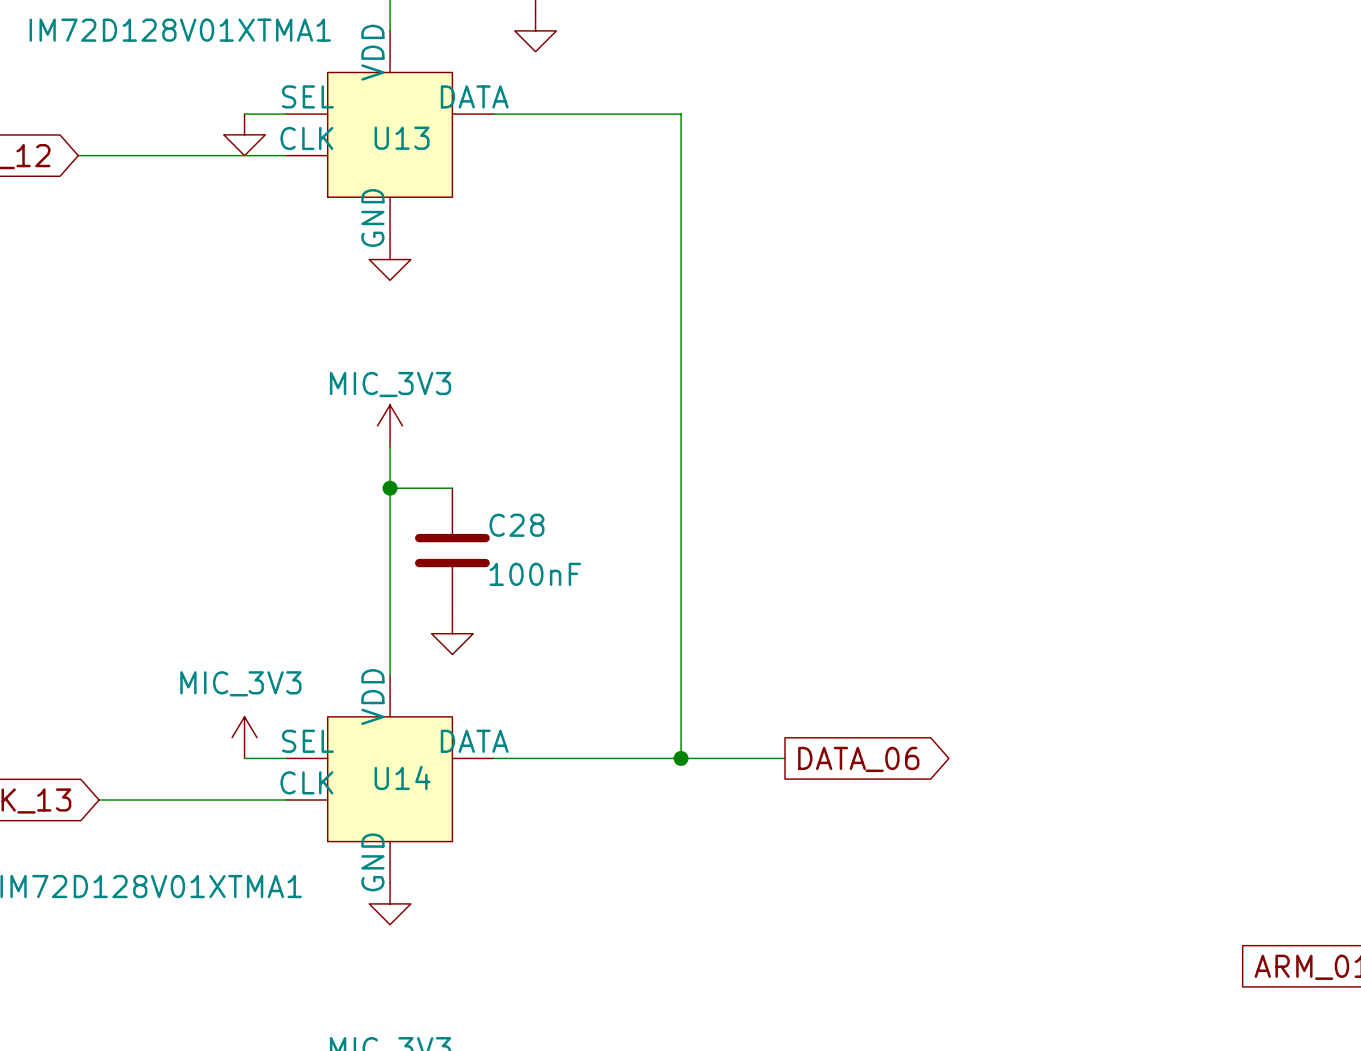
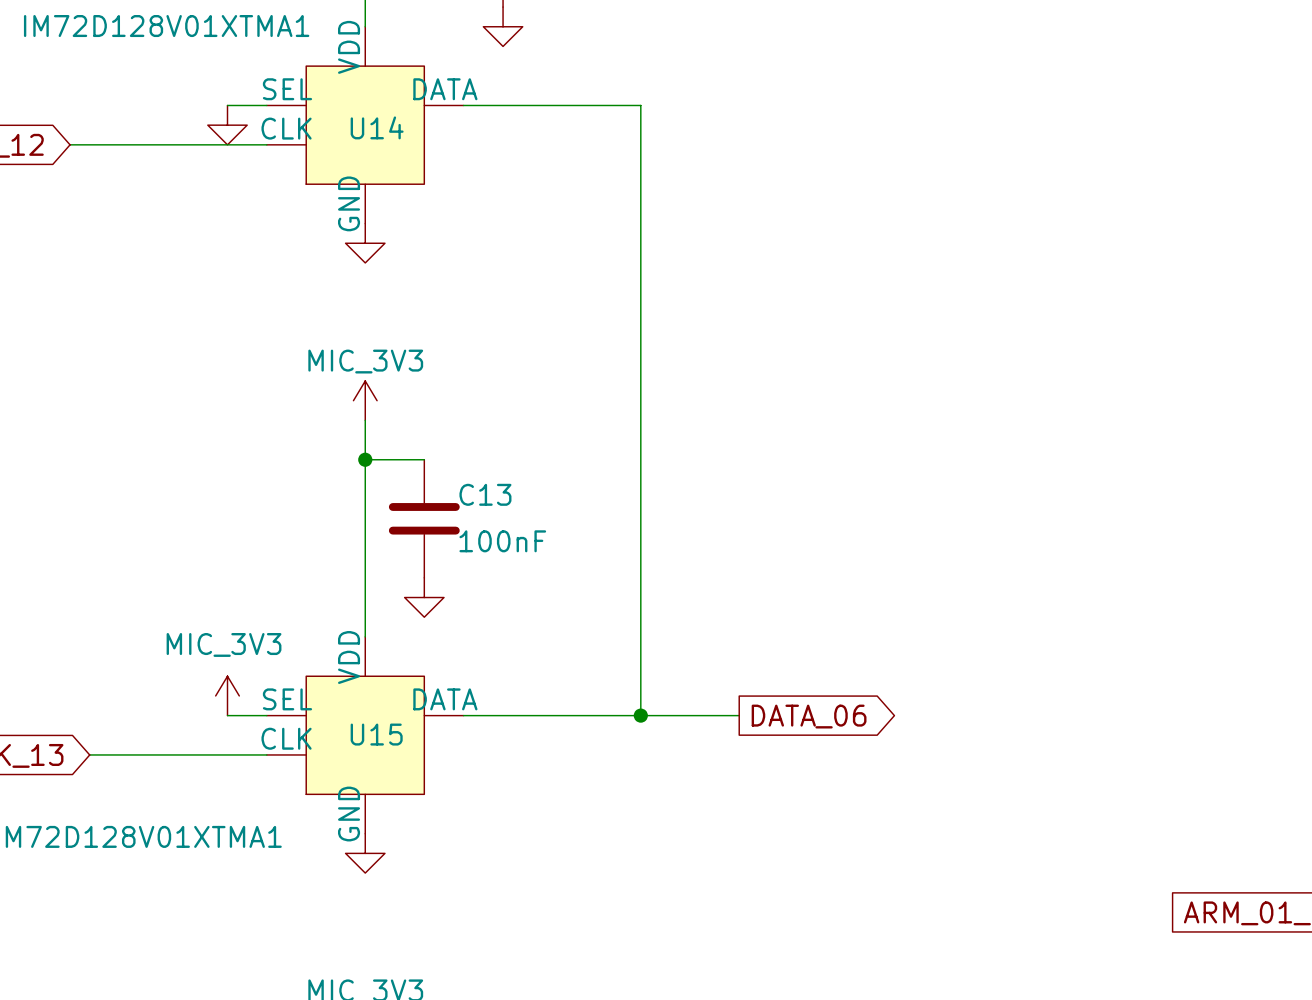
U13 name: U13 (402, 138) -> U14 (377, 127)
C28 name: C28 (516, 525) -> C13 (485, 494)
U14 name: U14 (402, 777) -> U15 (376, 734)

